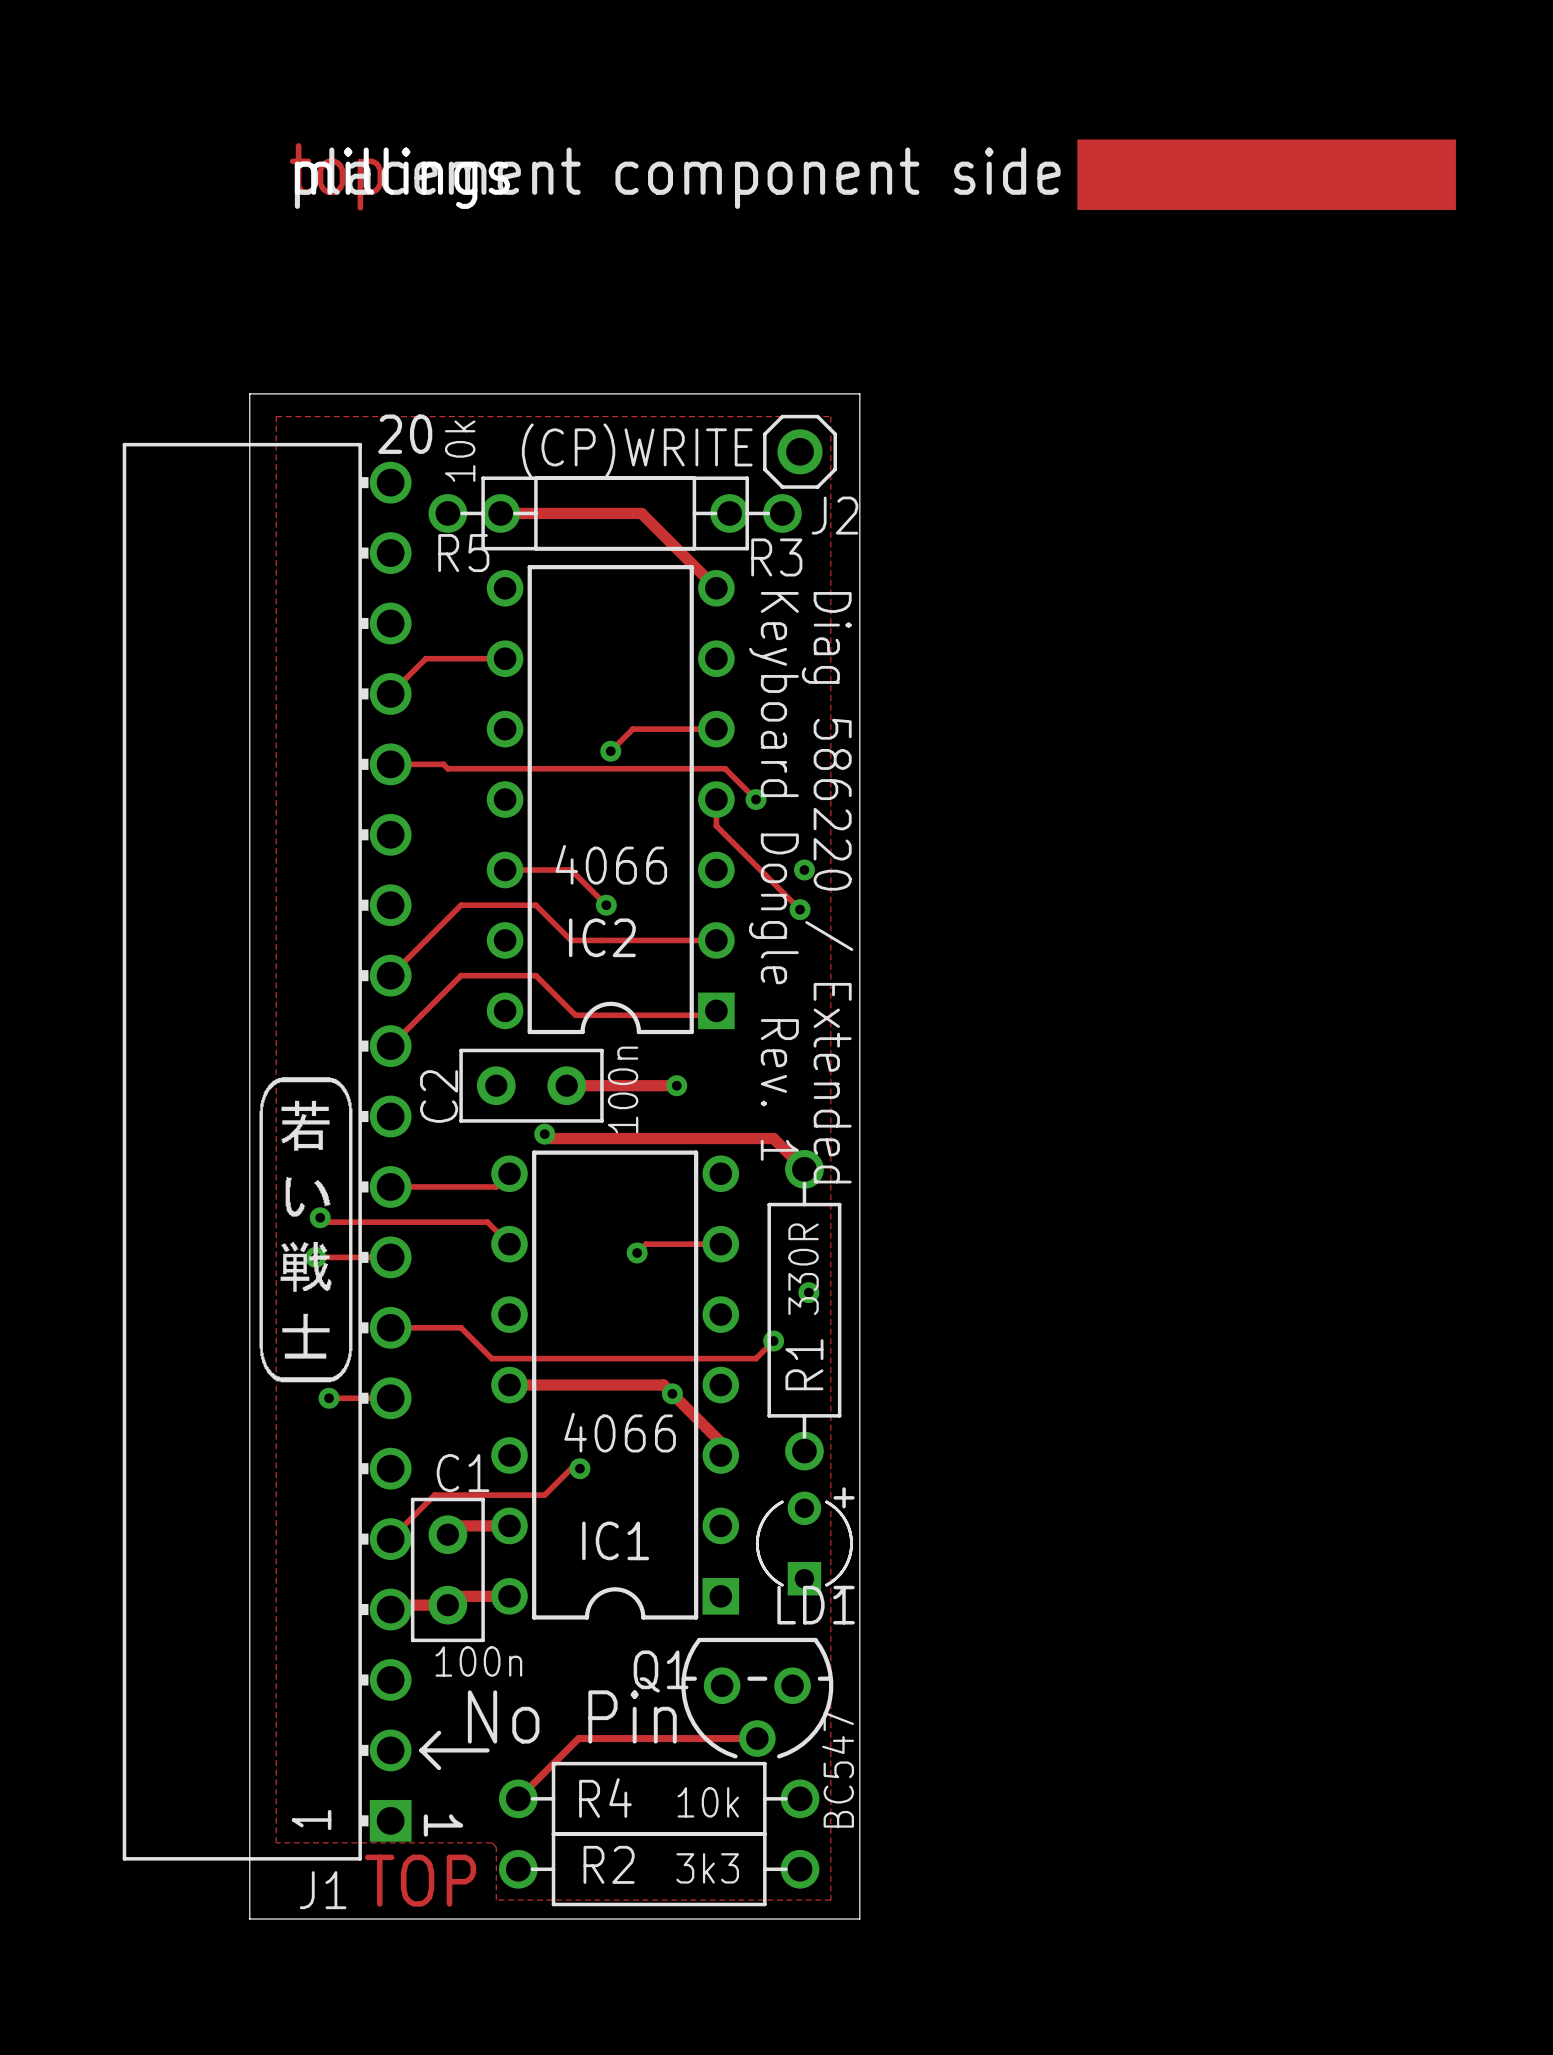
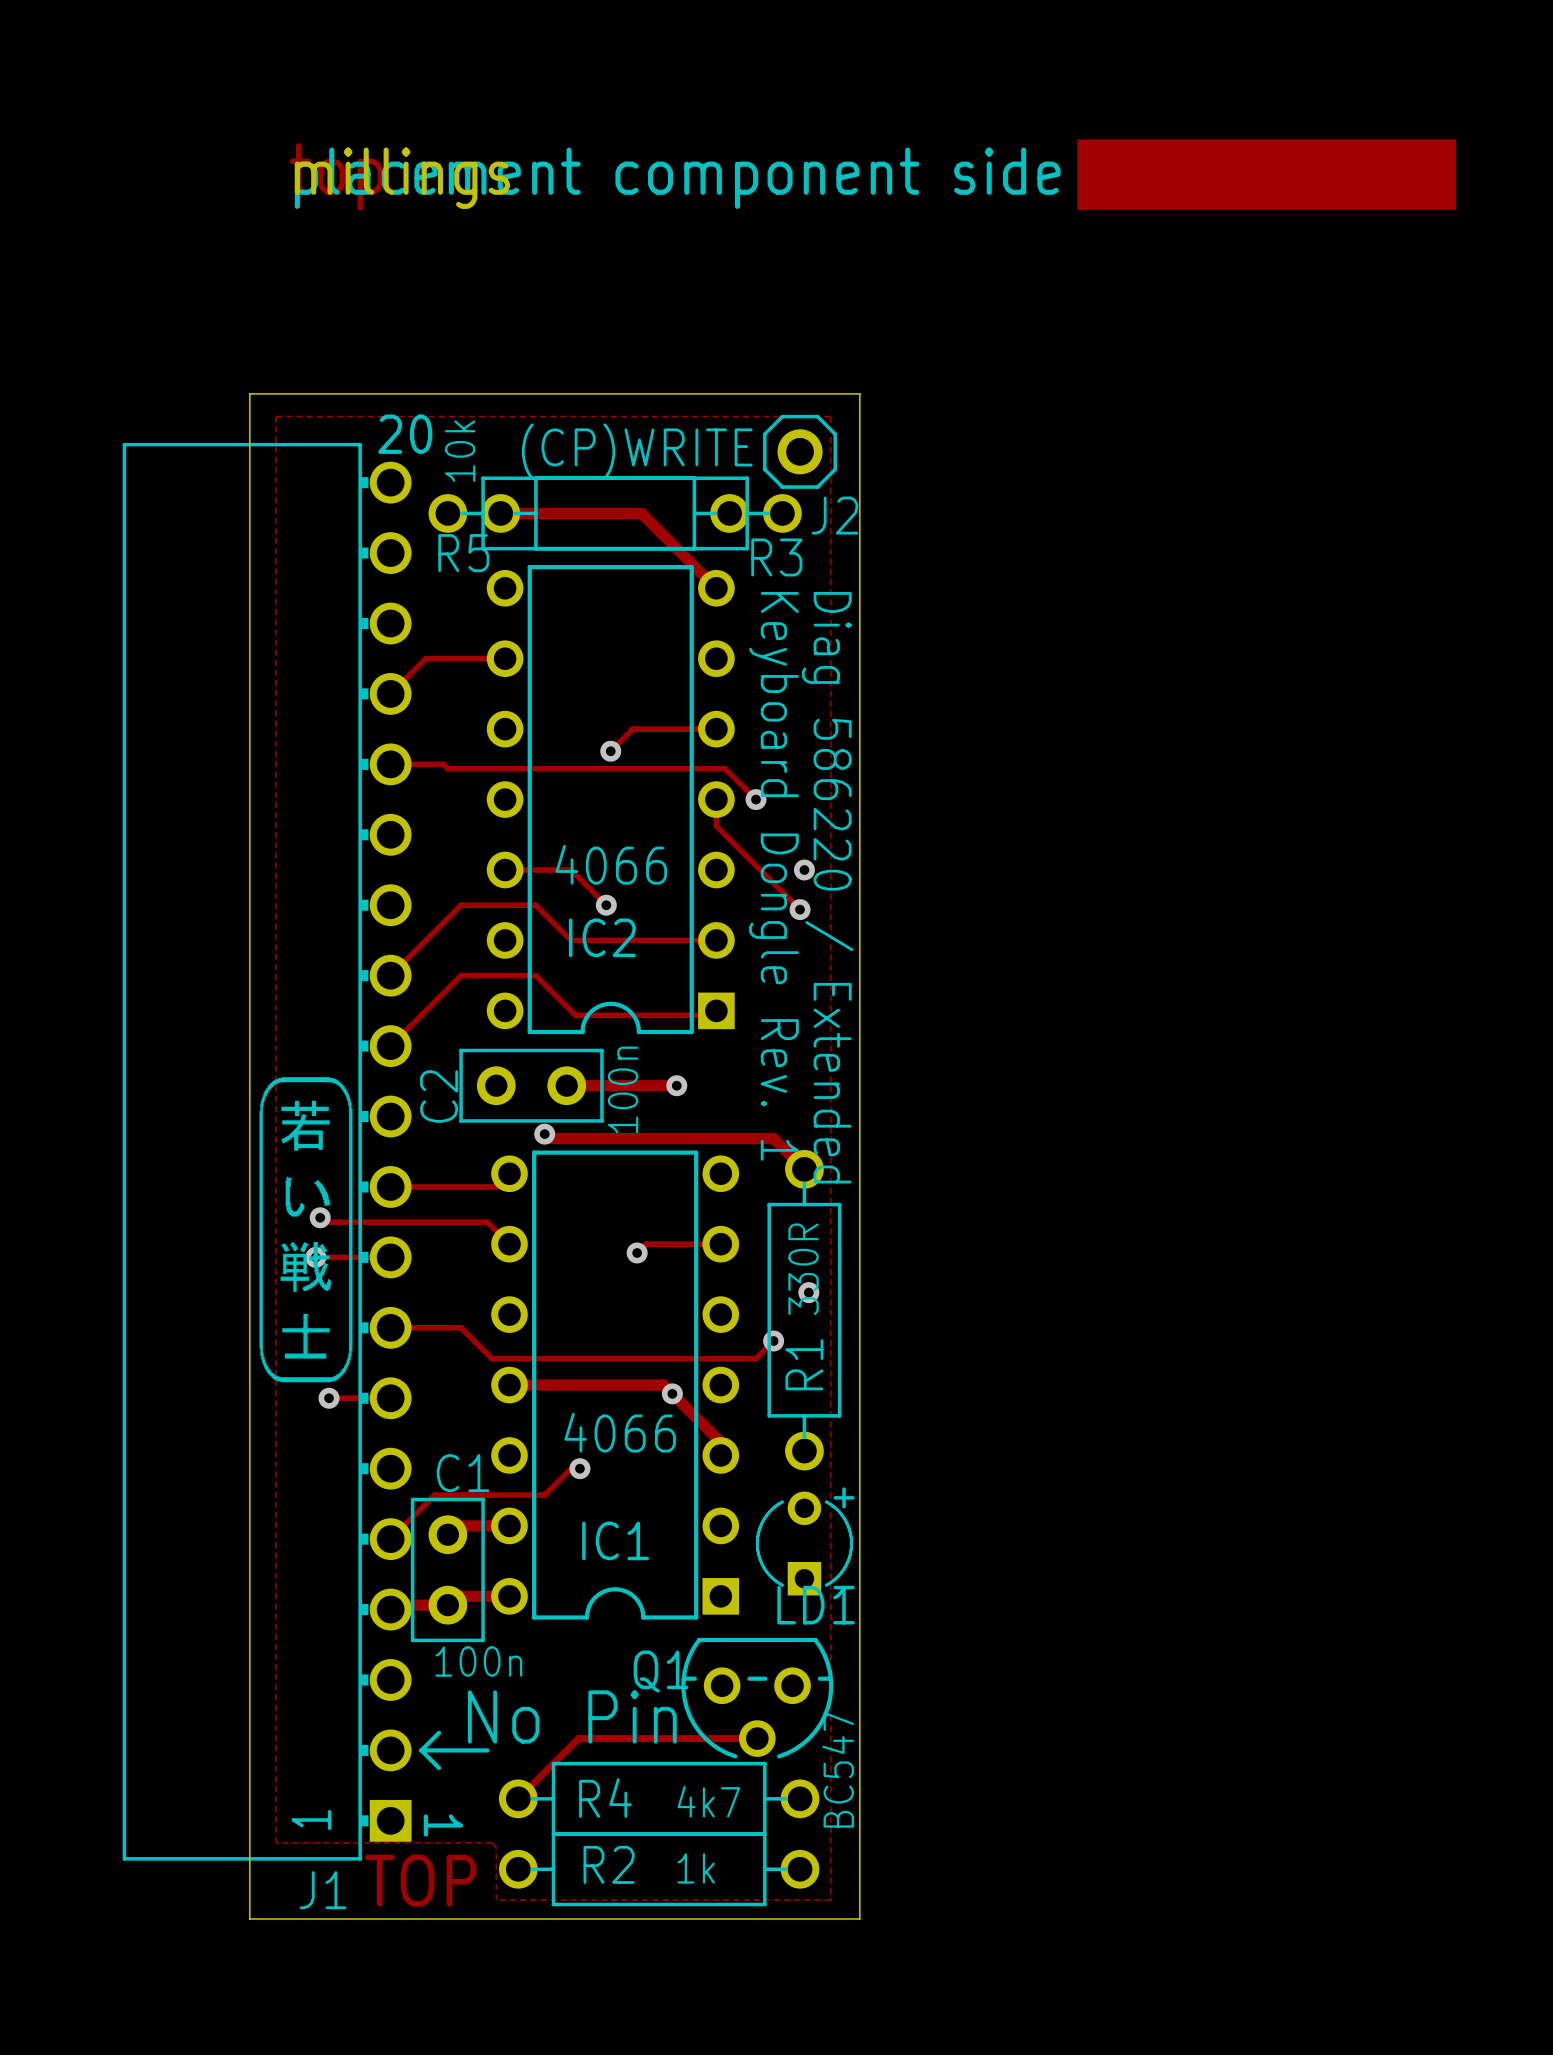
text: 10k (708, 1802) -> 4k7 (708, 1801)
text: 3k3 (707, 1868) -> 1k (696, 1868)

